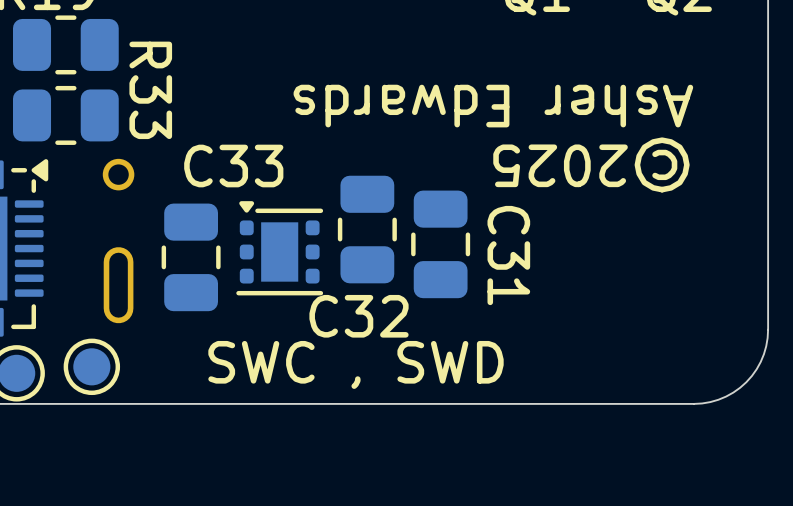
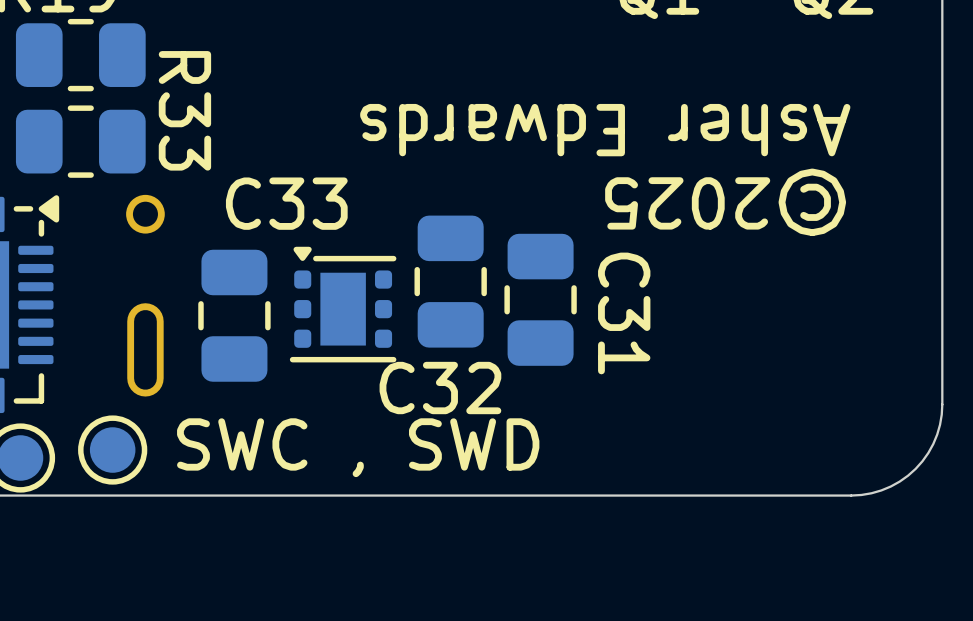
text position: SWC , SWD (356, 364) -> SWC , SWD (358, 447)

